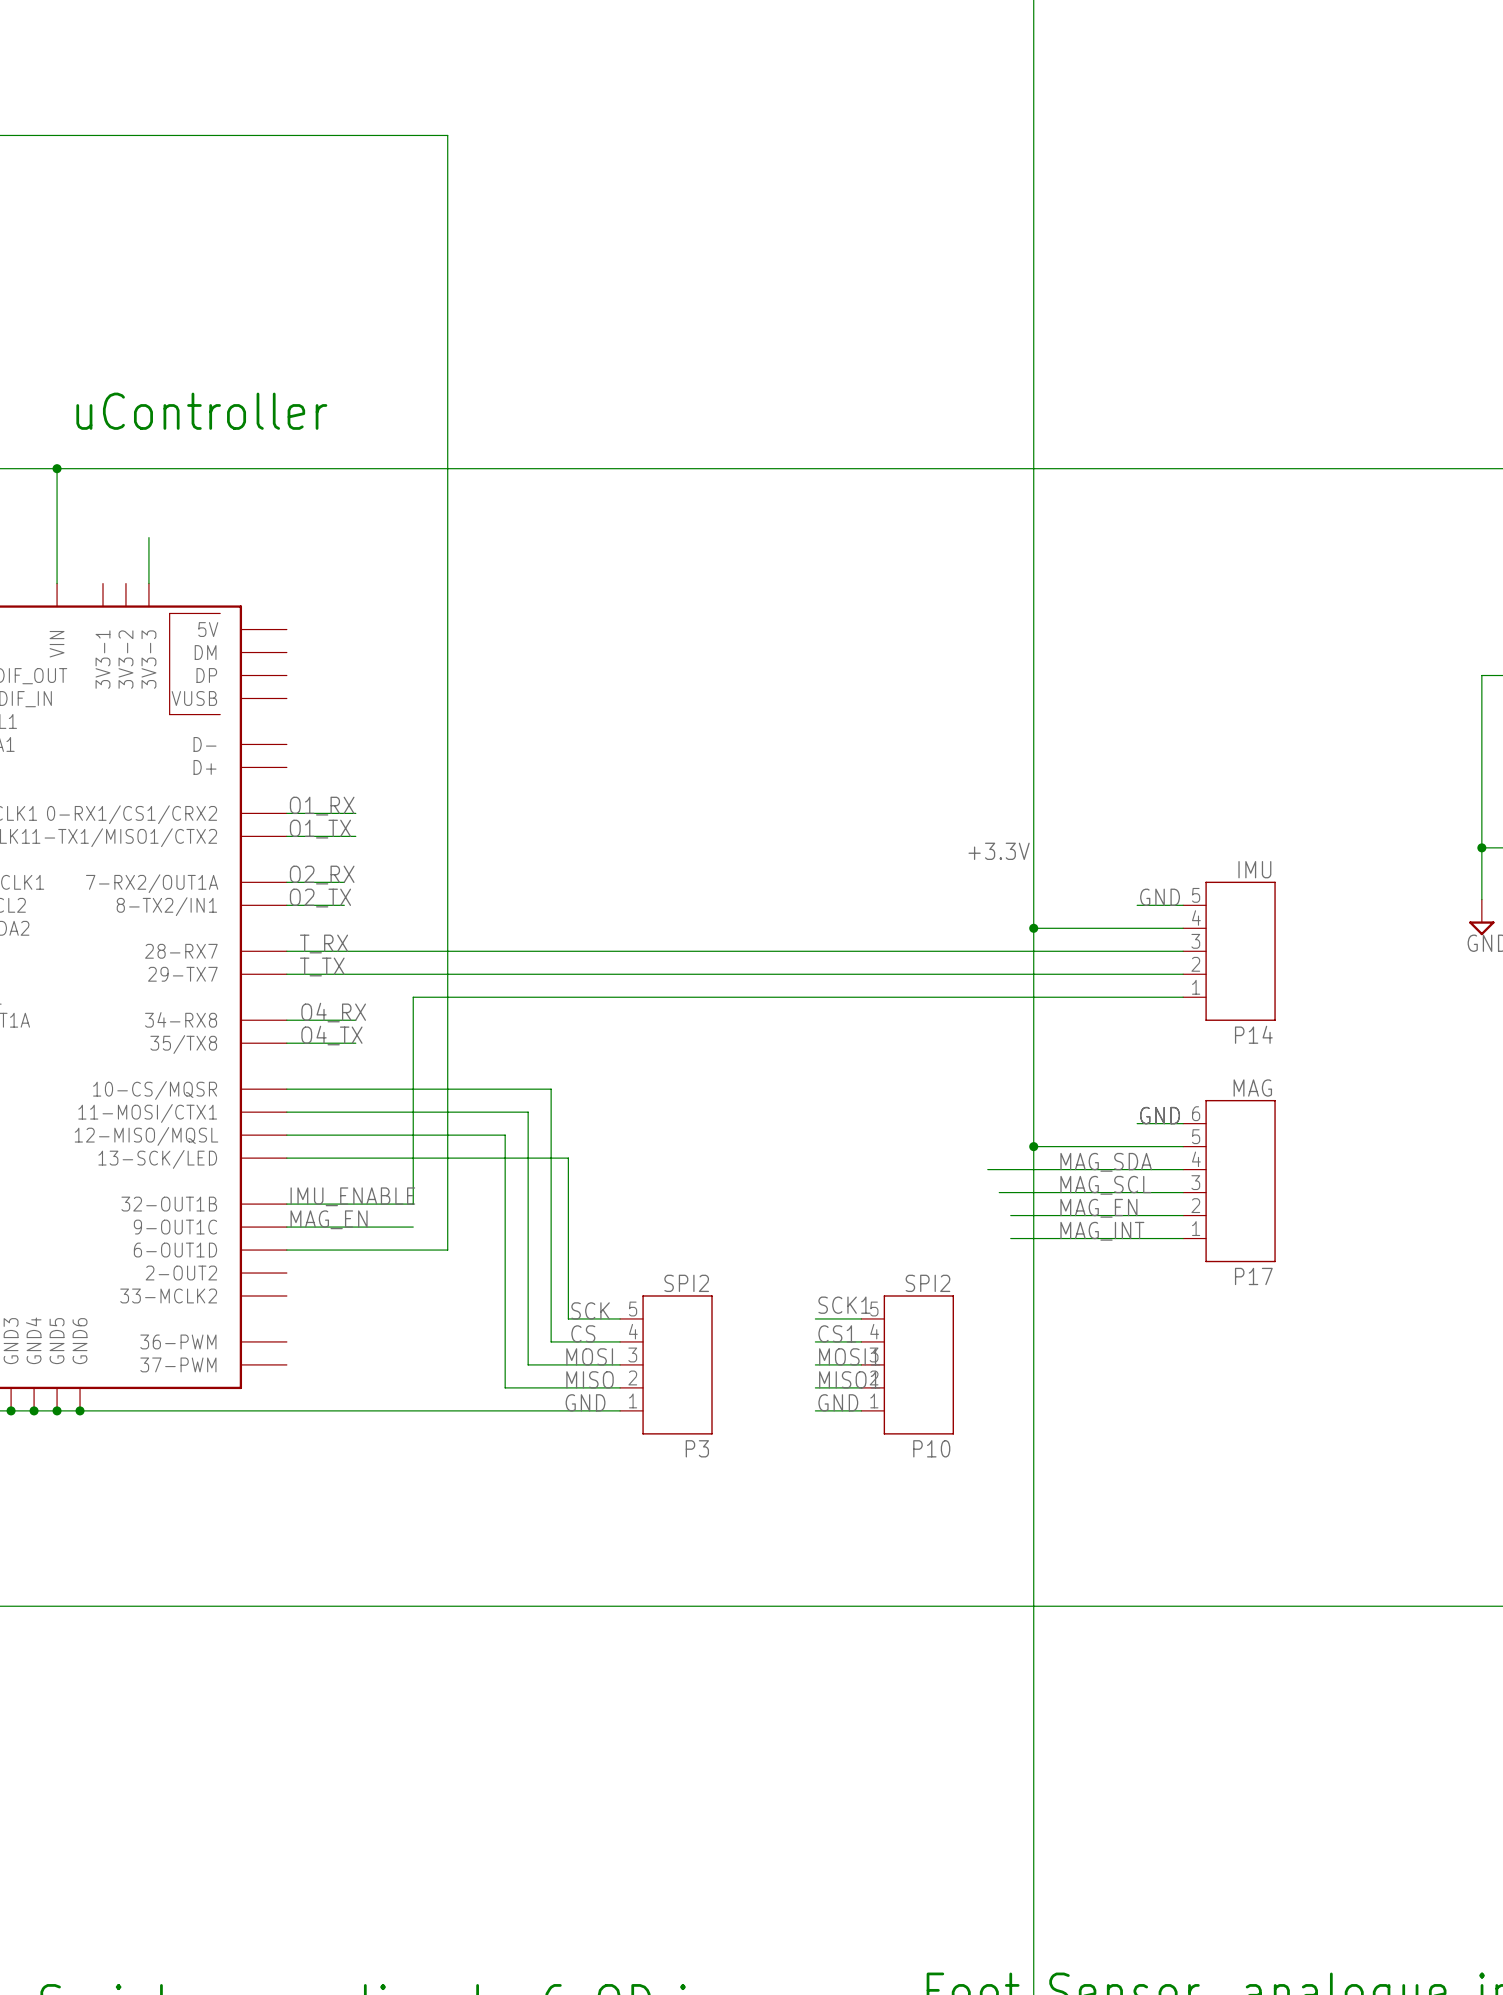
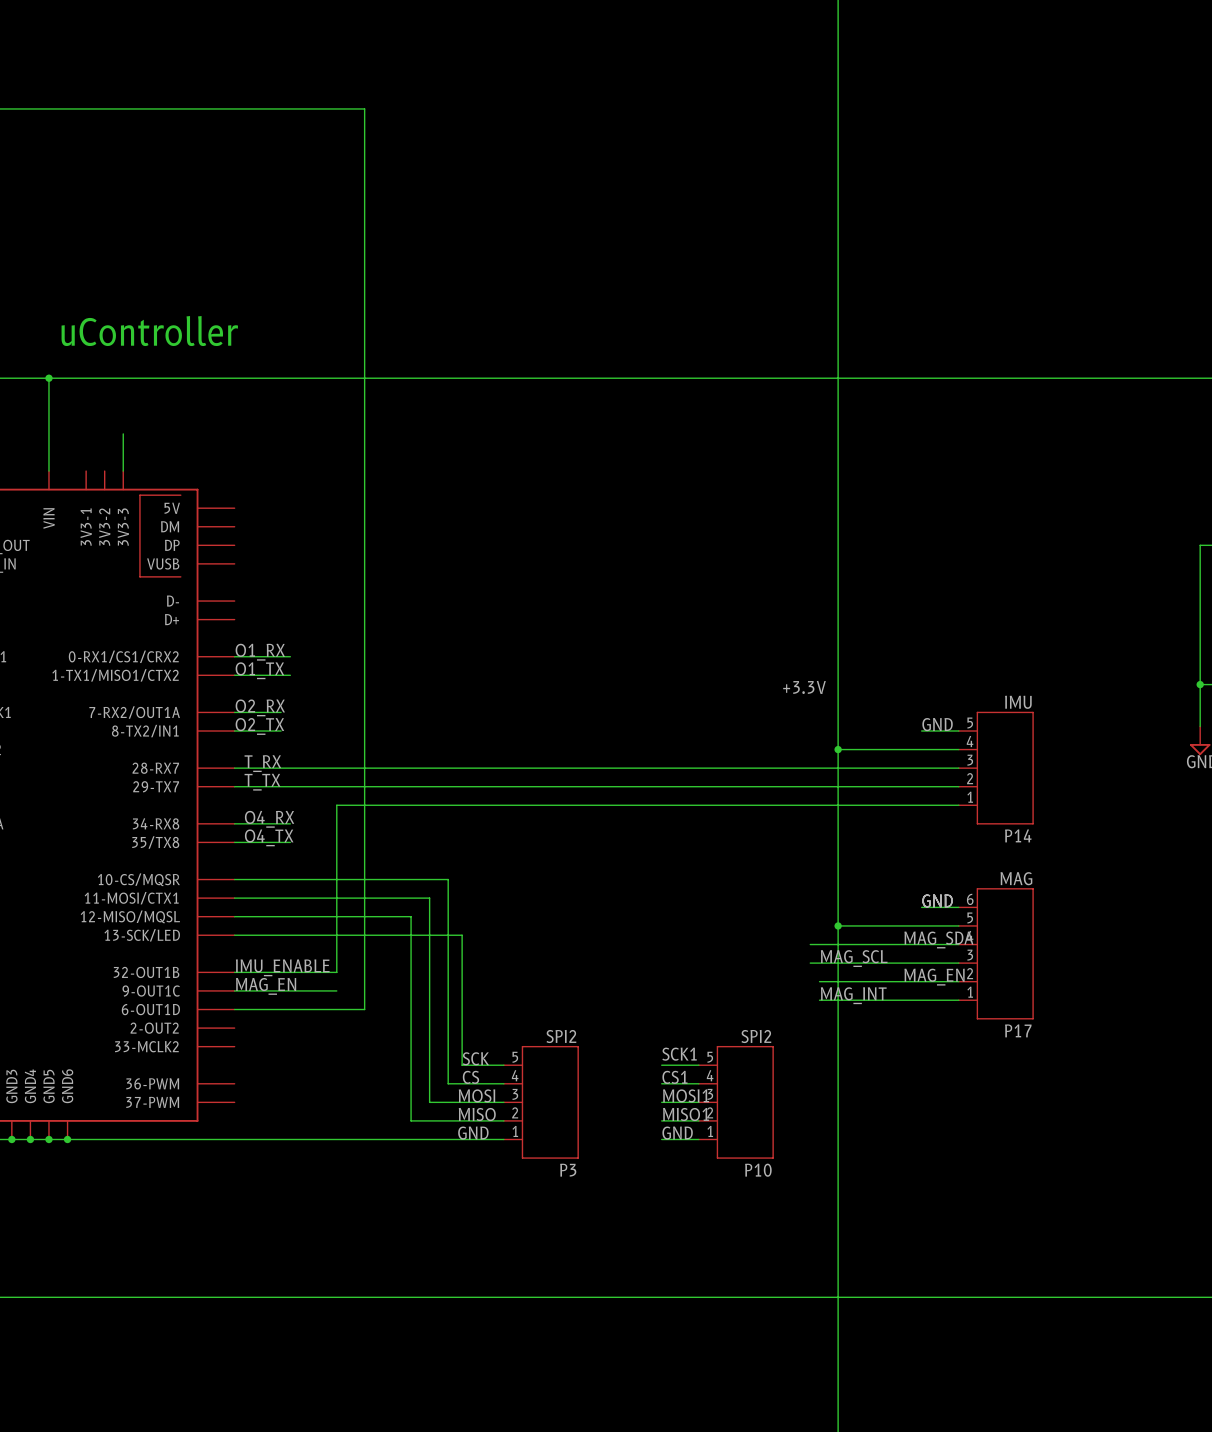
label position: MAG_SDA (1106, 1162) -> MAG_SDA (938, 939)
wire: (987, 1169) (999, 1169) -> none
label position: MAG_SCL (1105, 1185) -> MAG_SCL (854, 958)
label position: MAG_EN (1098, 1208) -> MAG_EN (934, 977)
label position: MAG_INT (1102, 1231) -> MAG_INT (853, 995)

